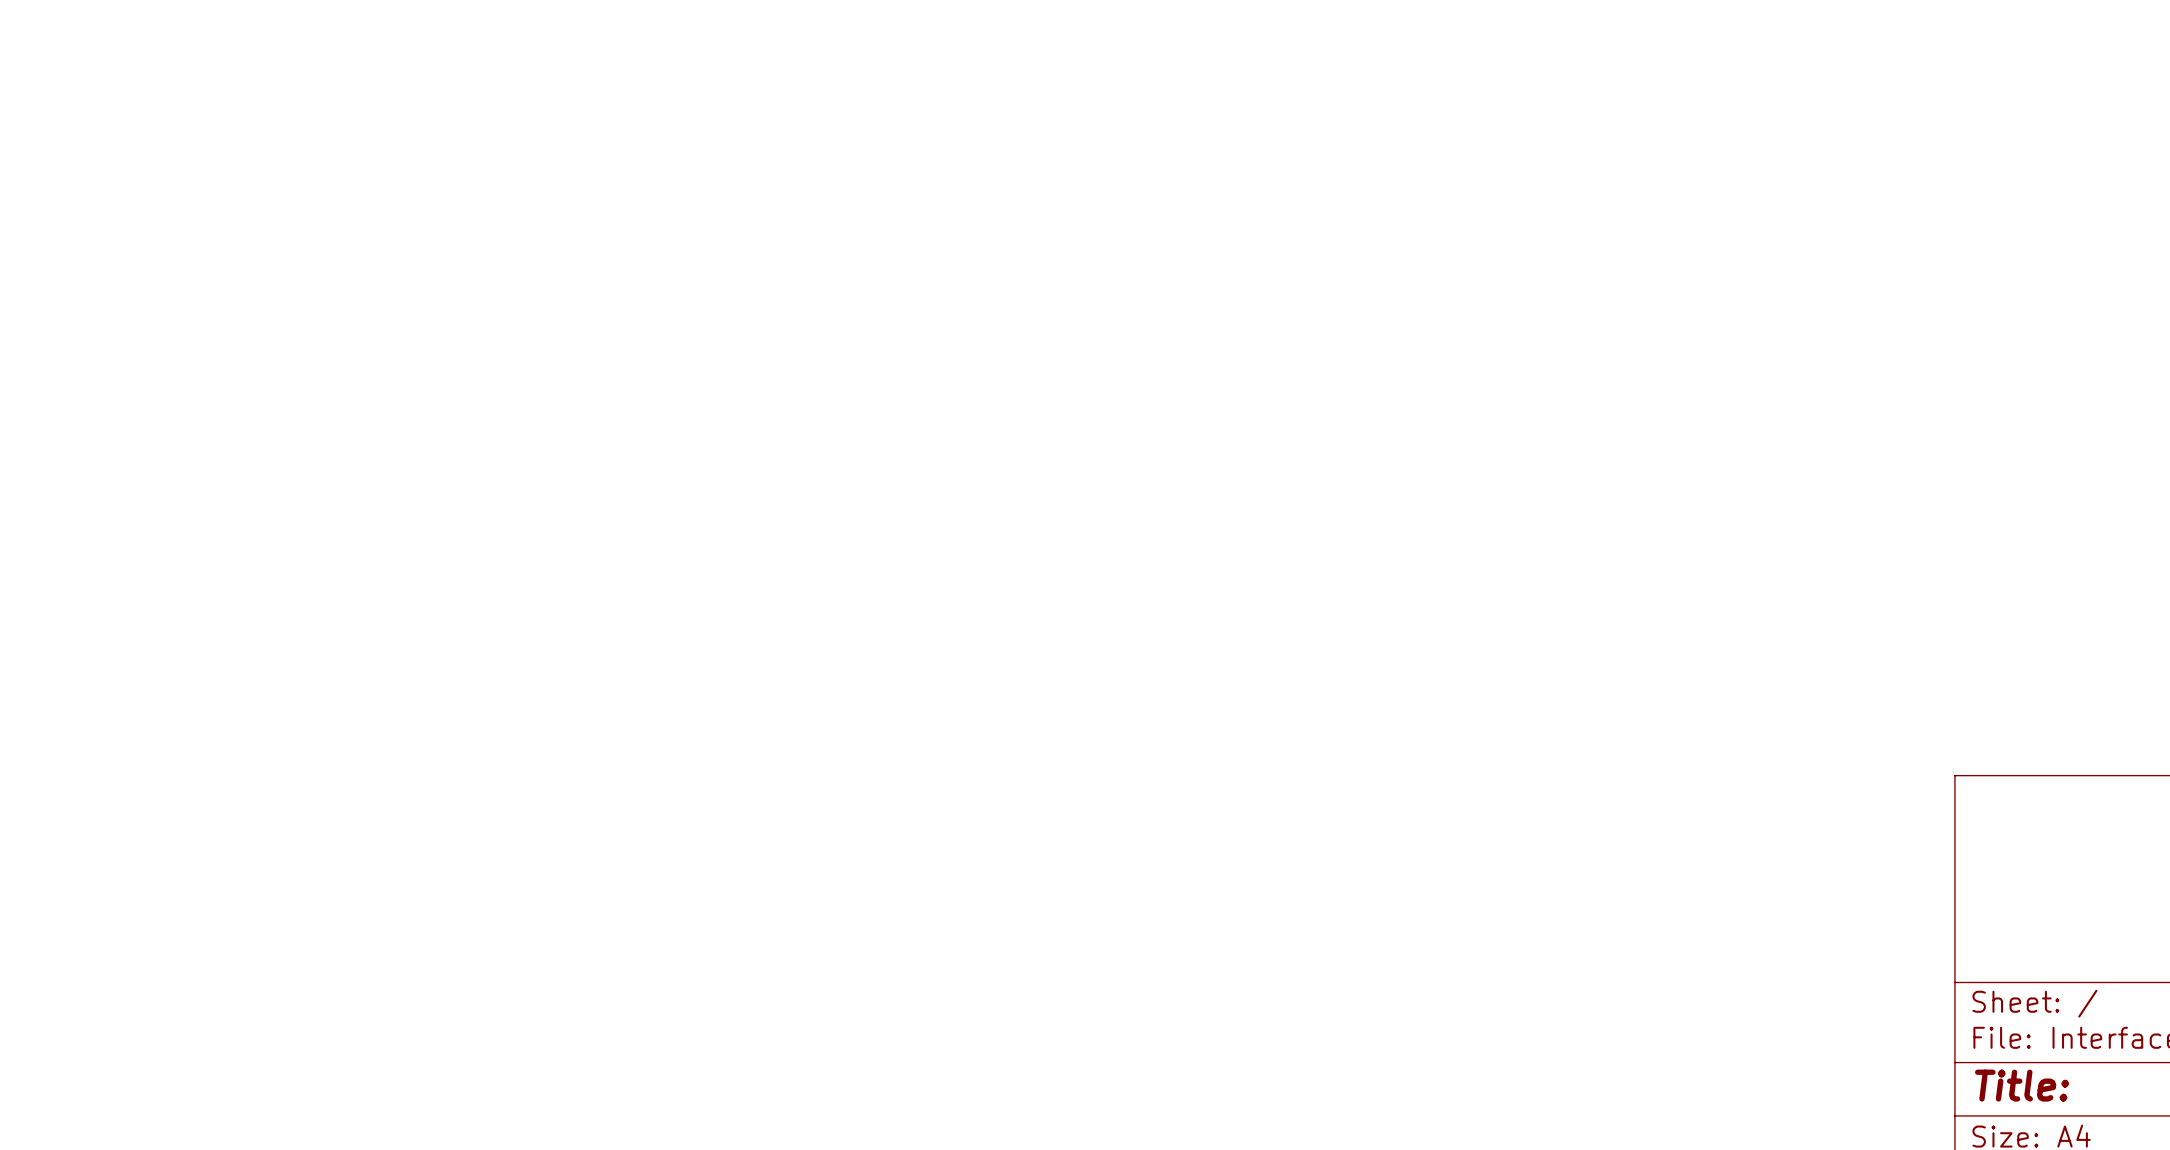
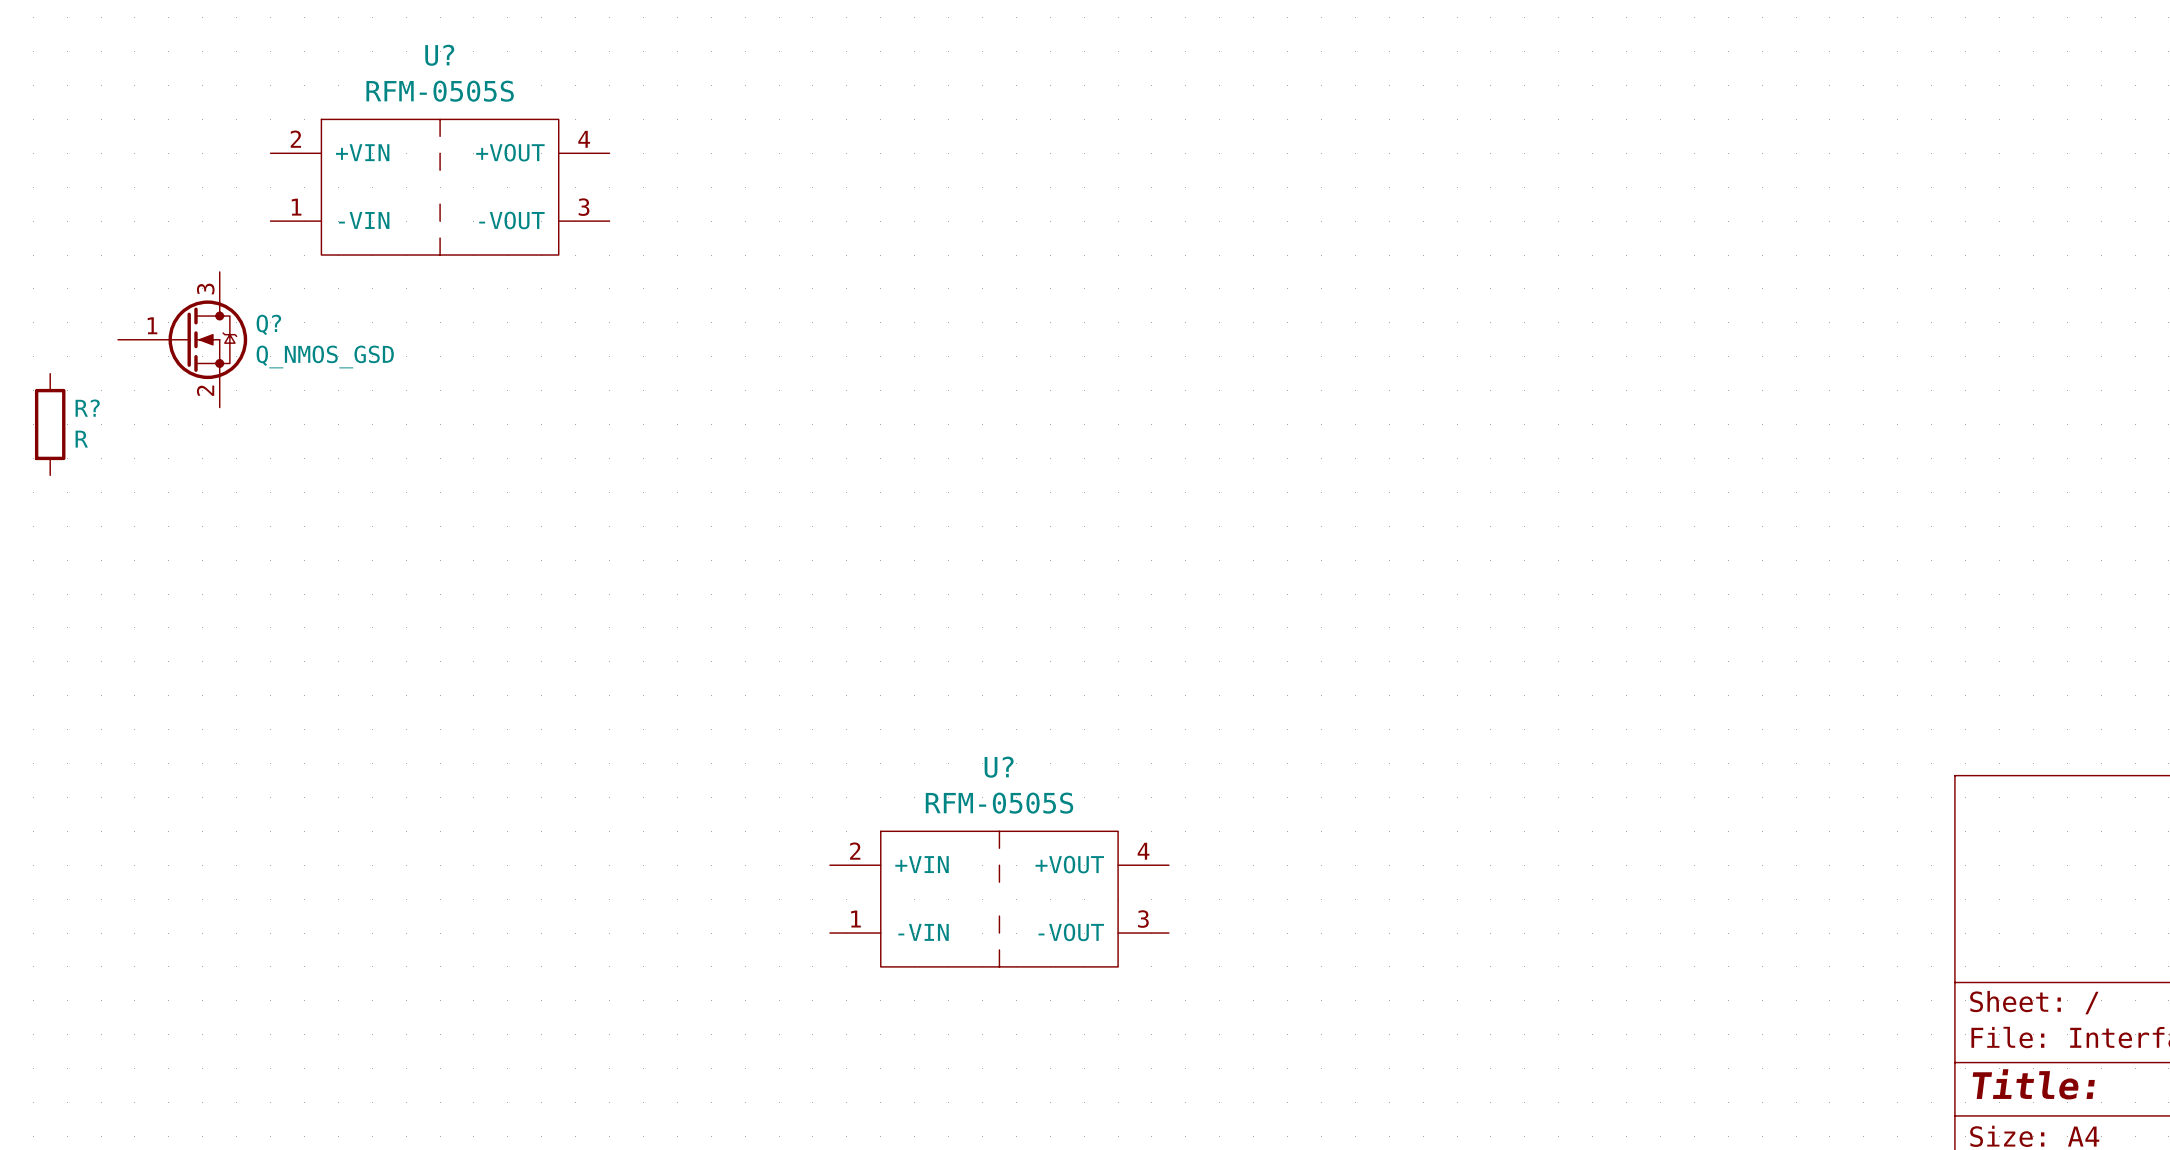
U?: none -> RFM-0505S (440, 187)
Q?: none -> Q_NMOS_GSD (182, 339)
R?: none -> R (50, 424)
U?: none -> RFM-0505S (999, 899)

